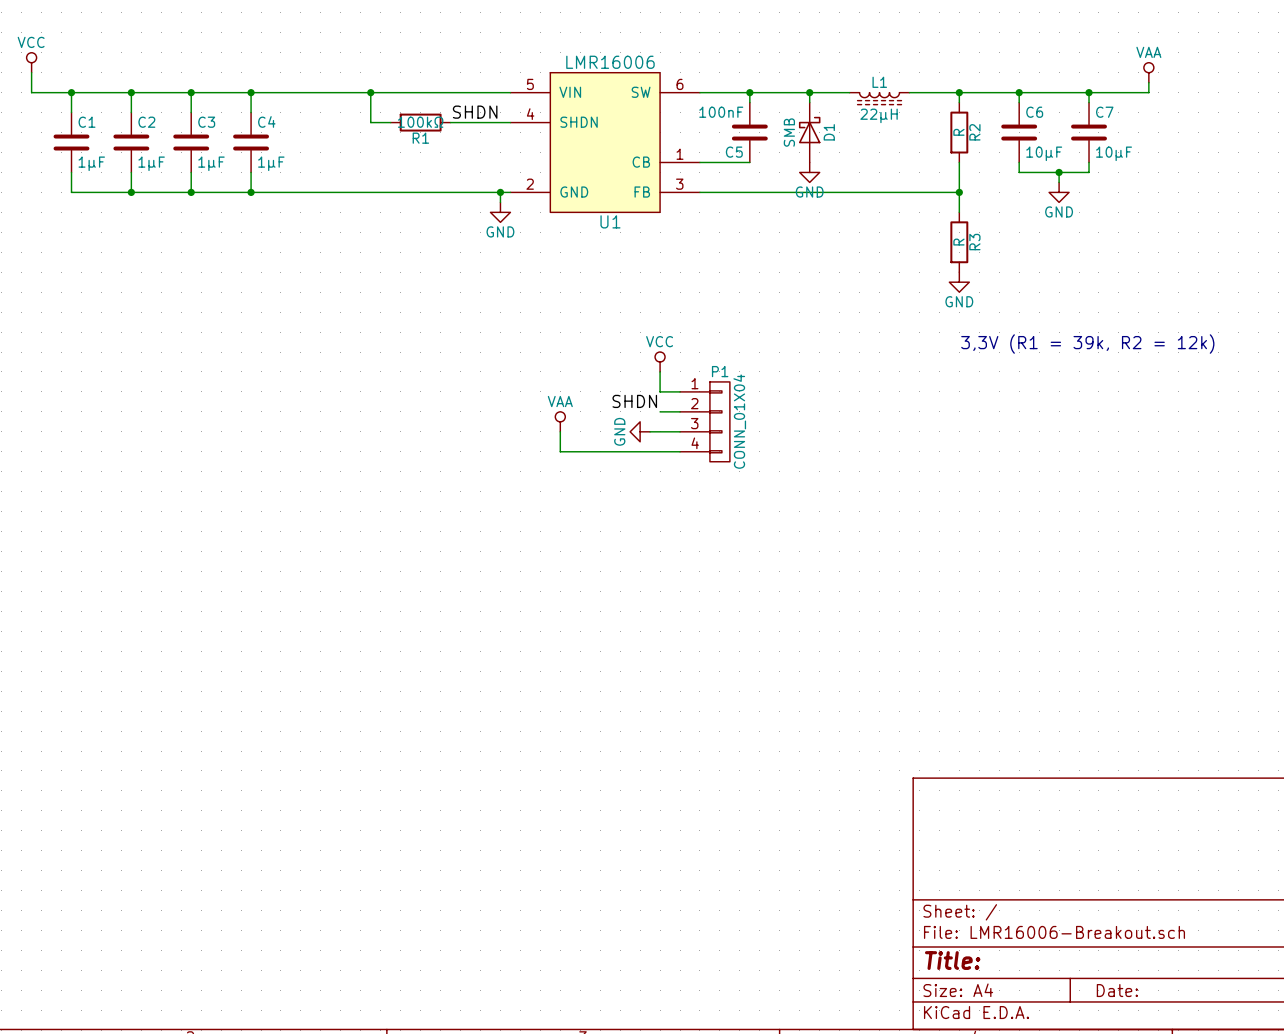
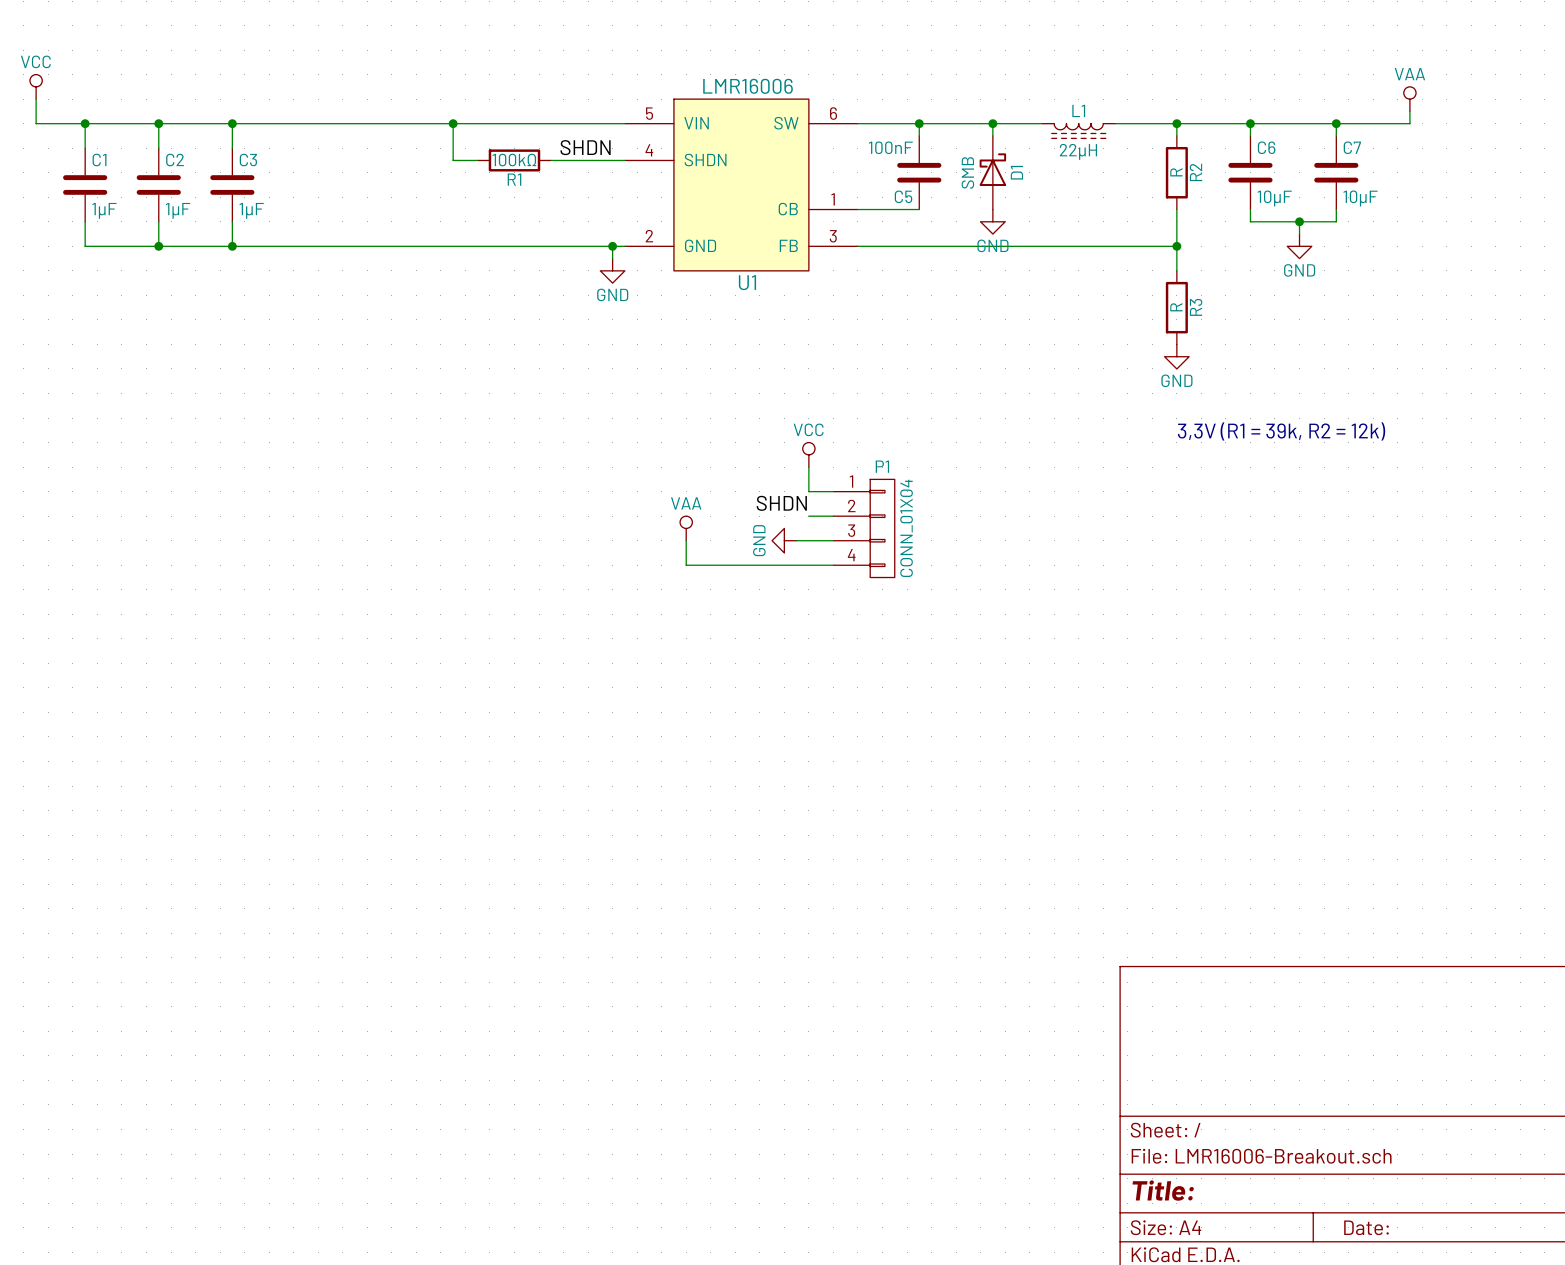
wire: (251, 92) (251, 112) -> none
junction: (251, 92) -> none
C4: 1µF (251, 142) -> none
wire: (251, 172) (251, 192) -> none
junction: (251, 192) -> none

